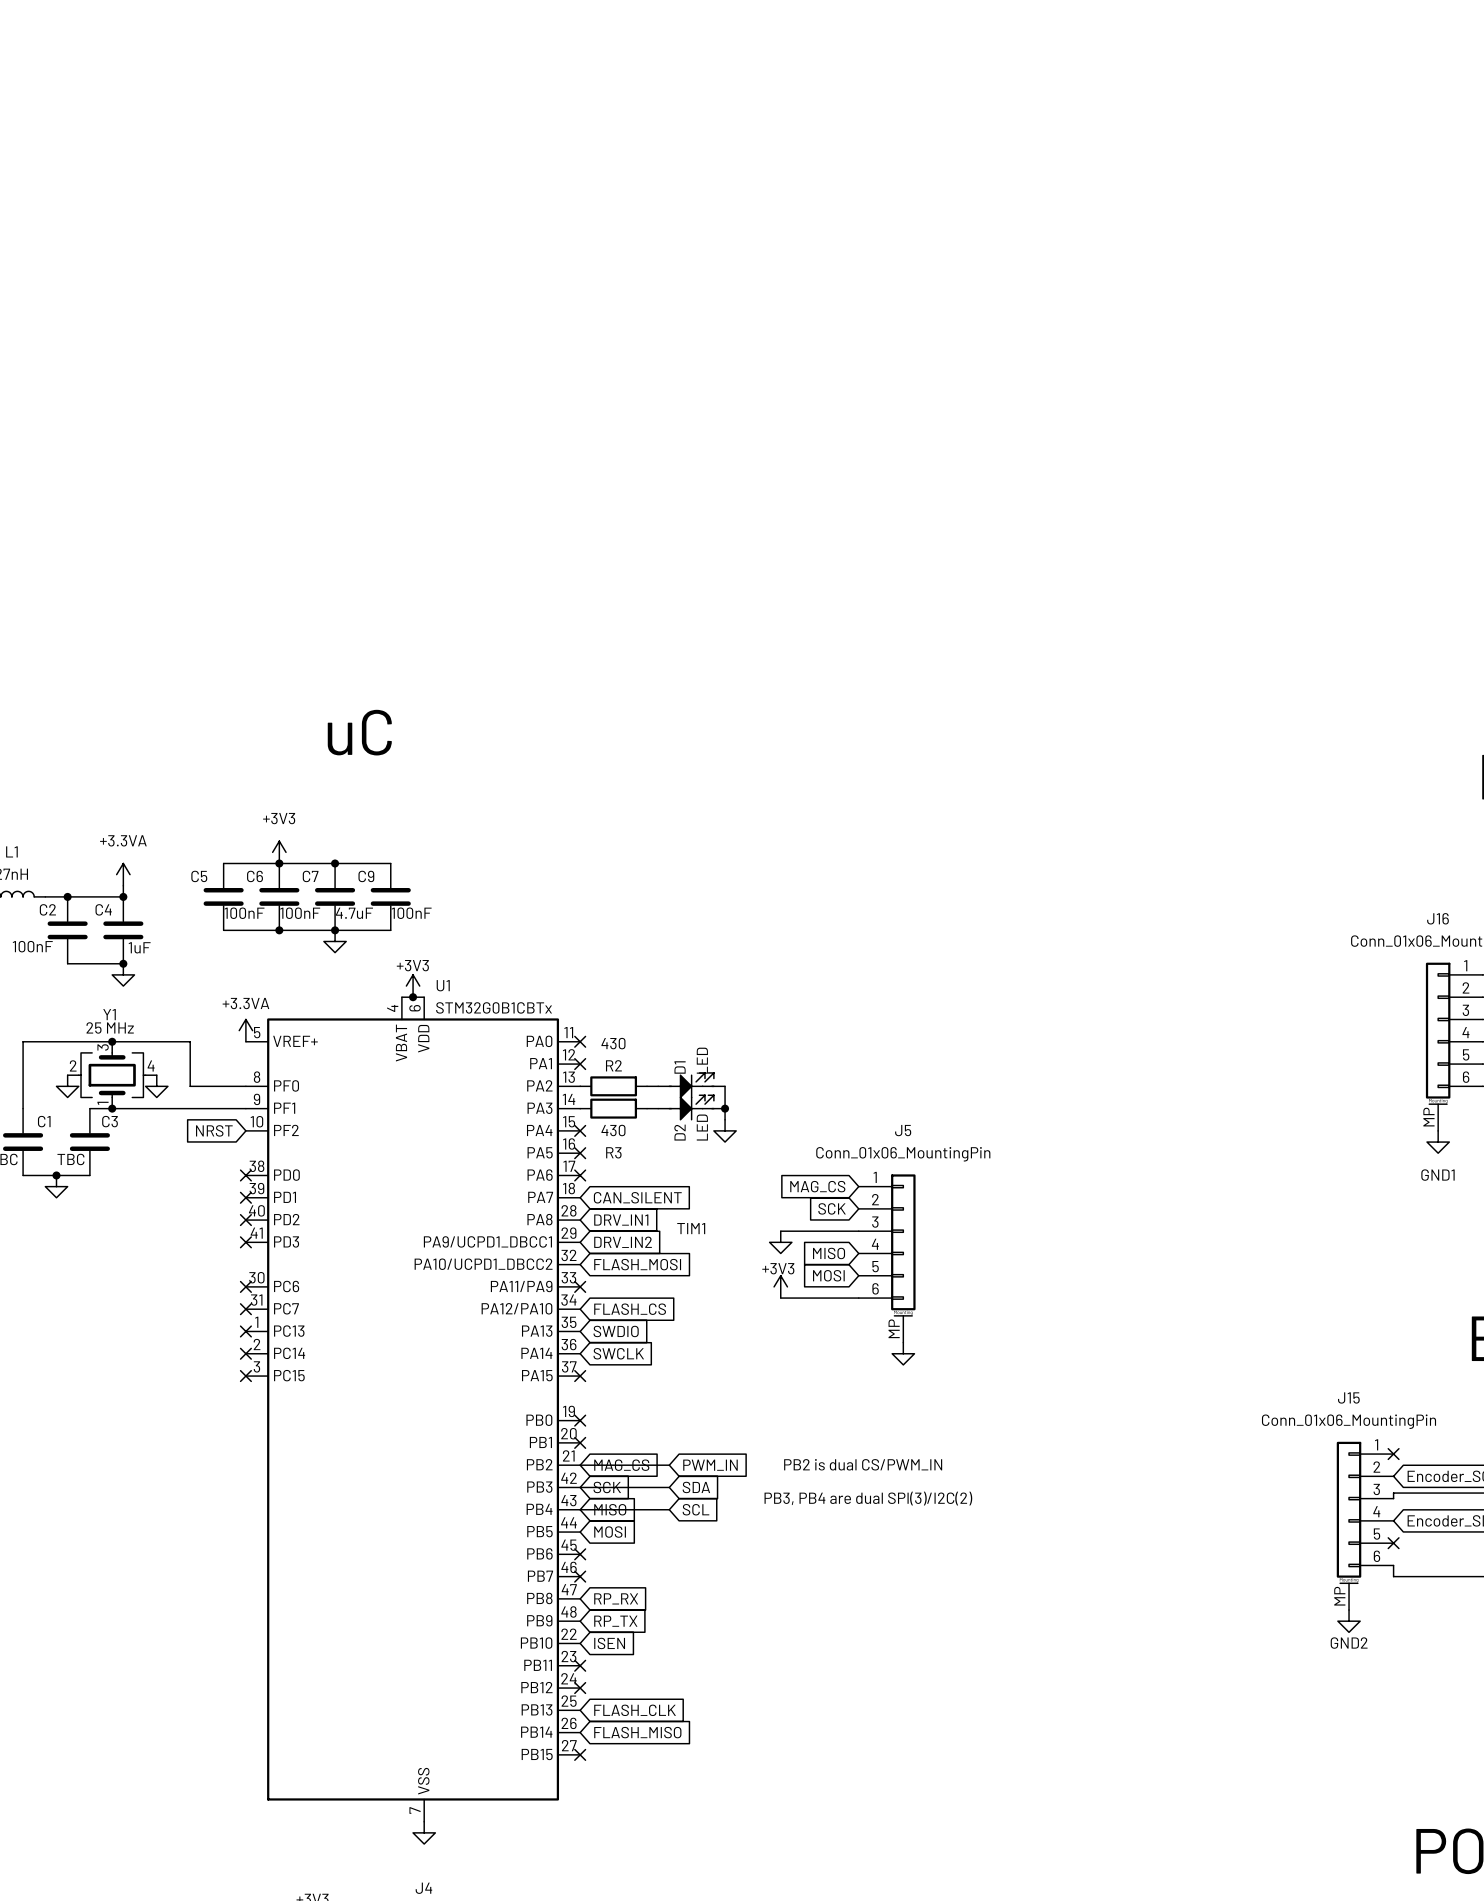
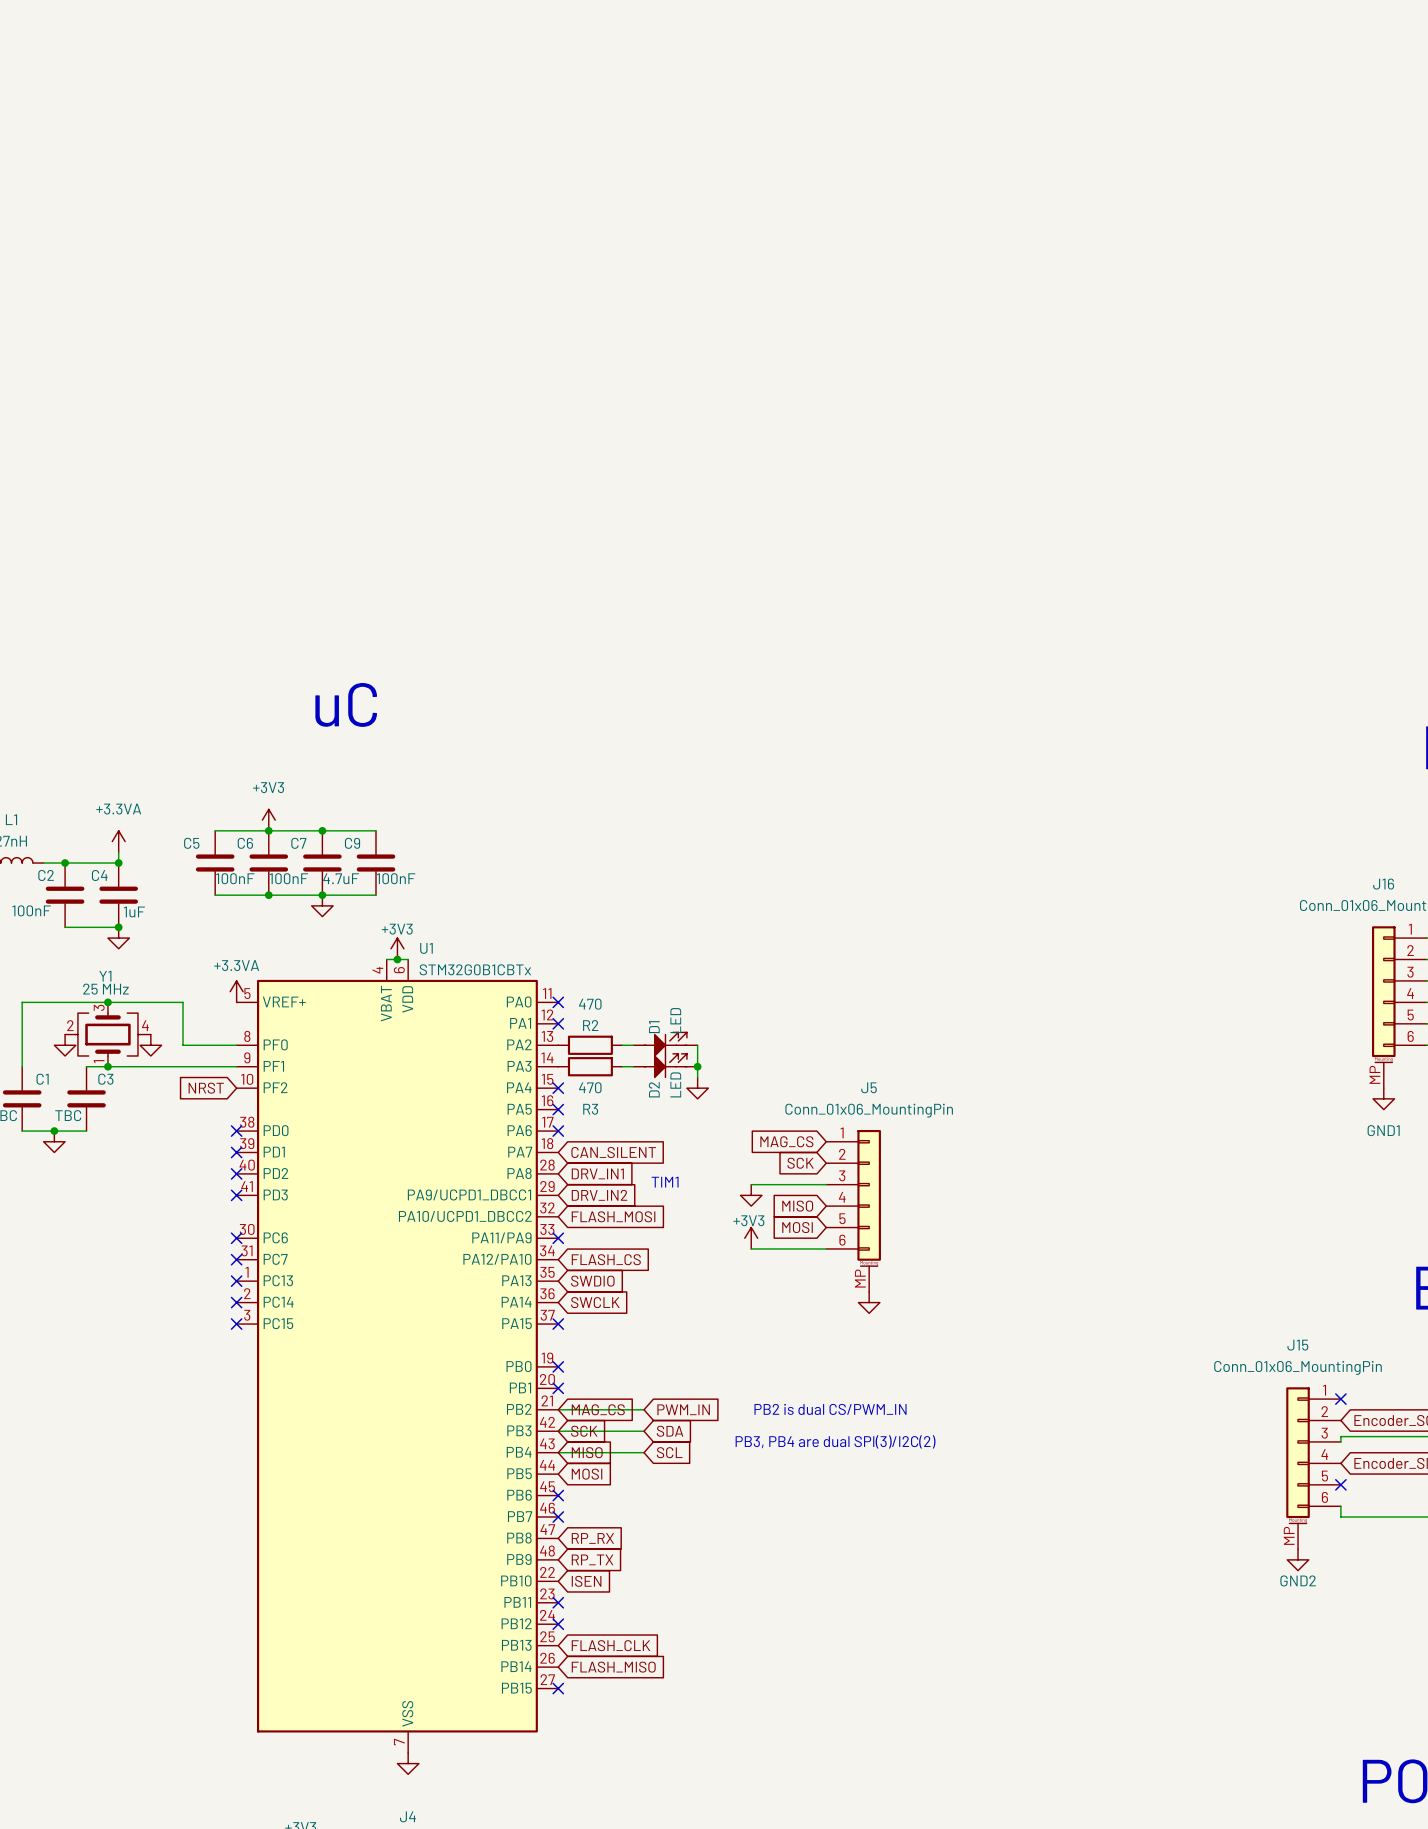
R2 value: 430 (613, 1043) -> 470 (590, 1004)
R3 value: 430 (613, 1130) -> 470 (590, 1087)

